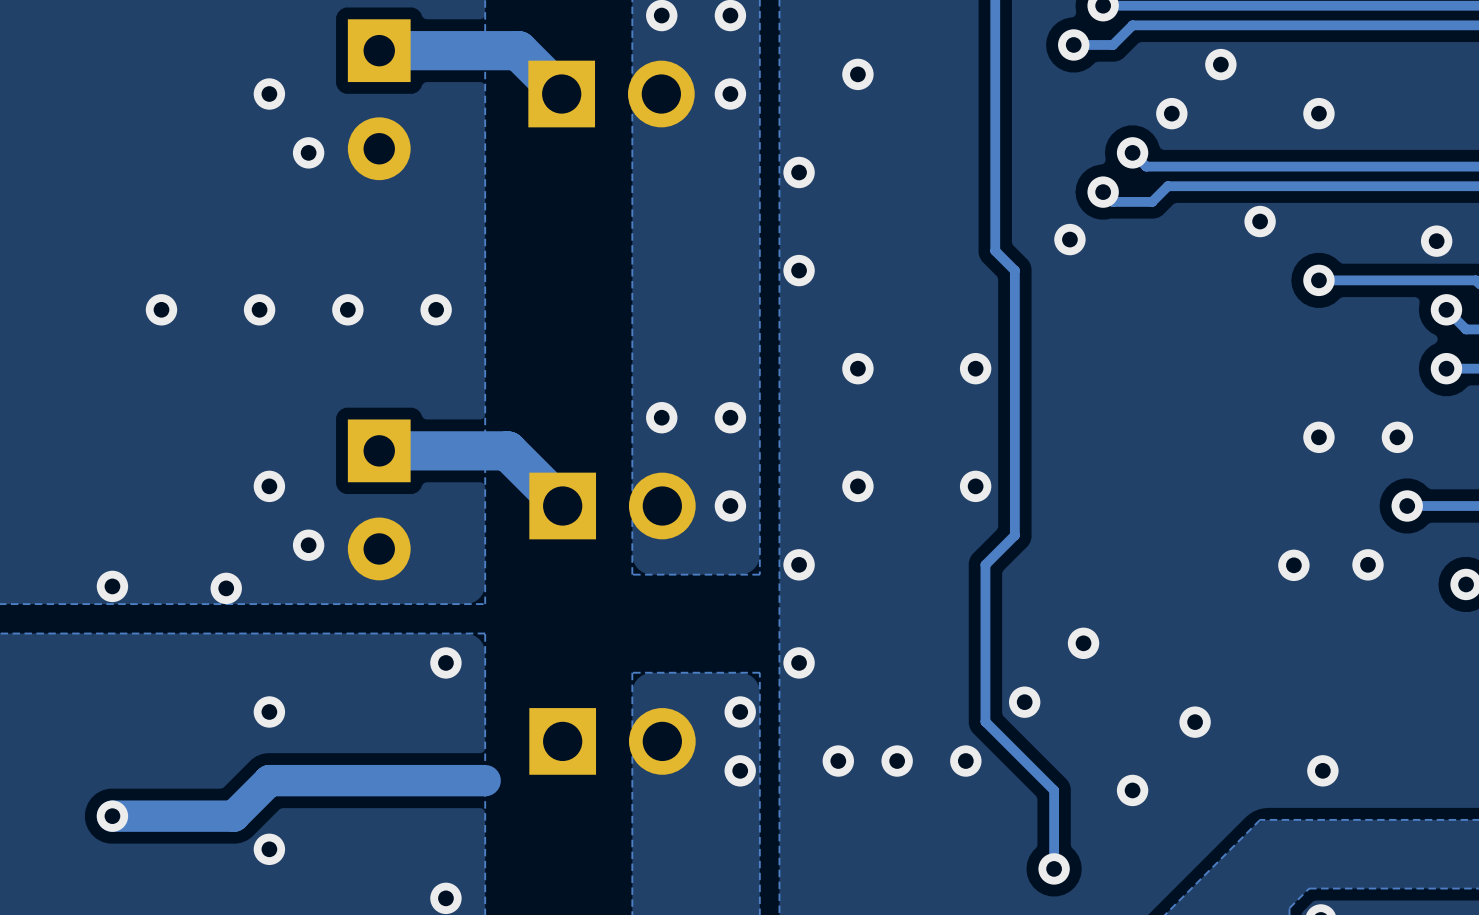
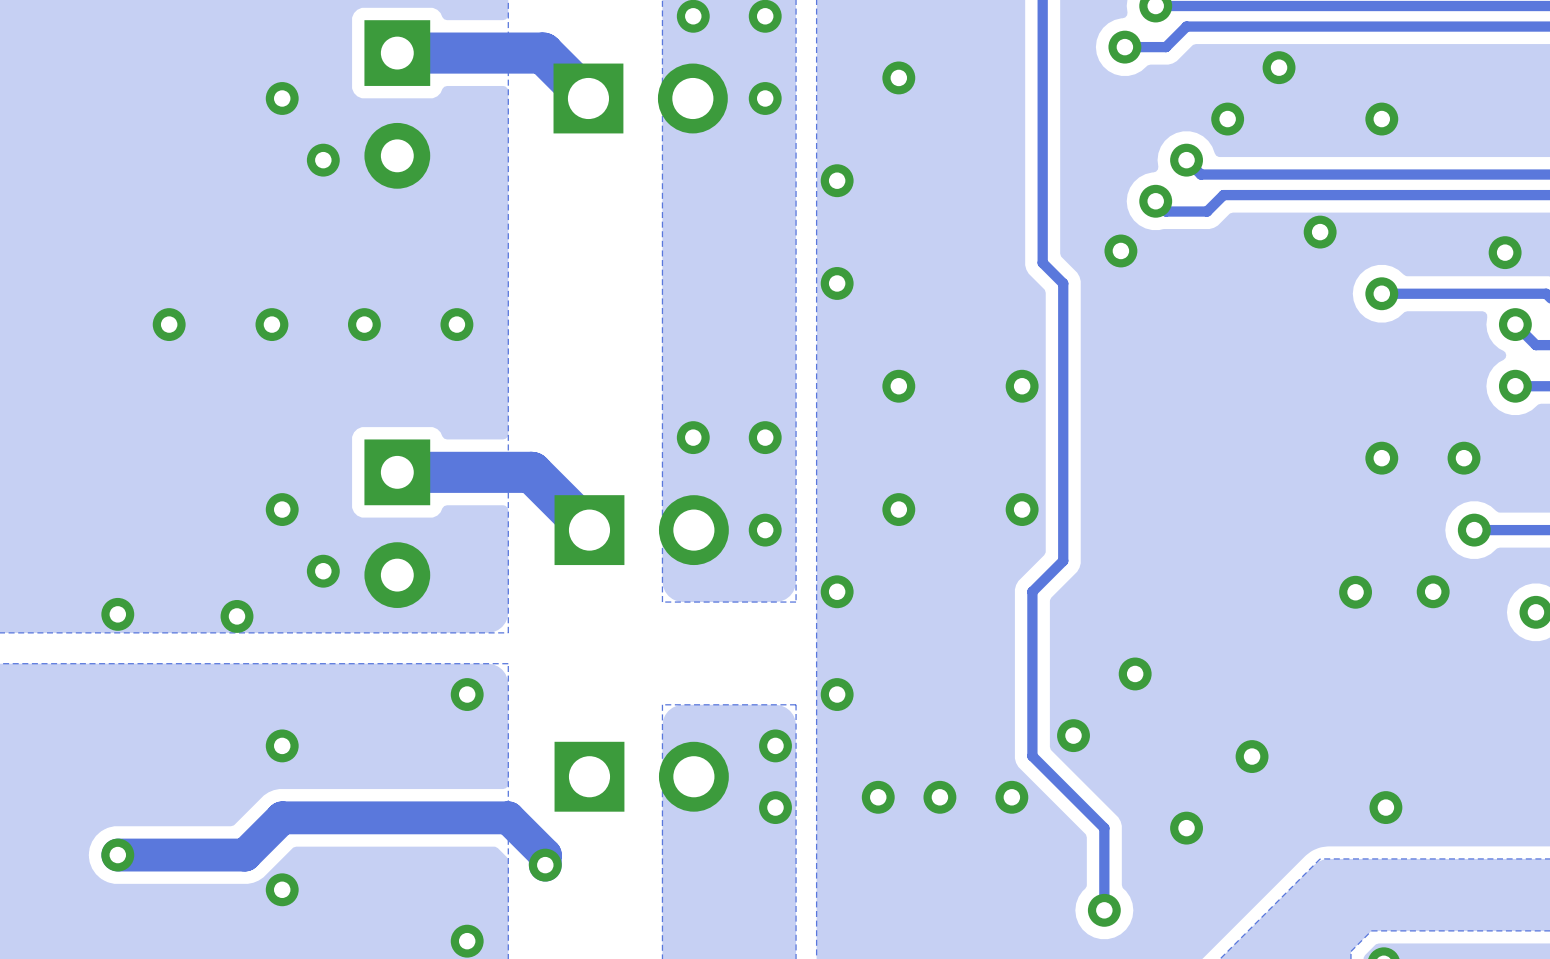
track: none -> (508, 817) (545, 854) (545, 865)
via: none -> (545, 865)

